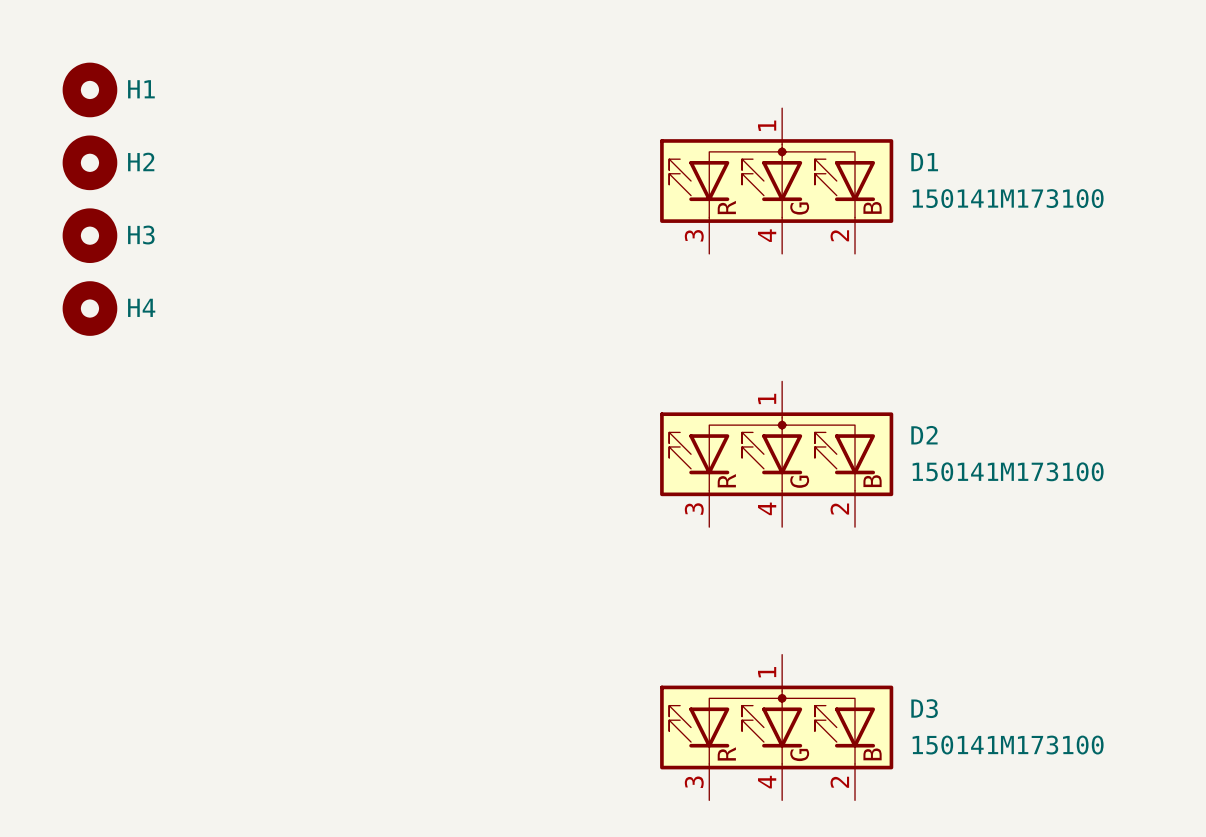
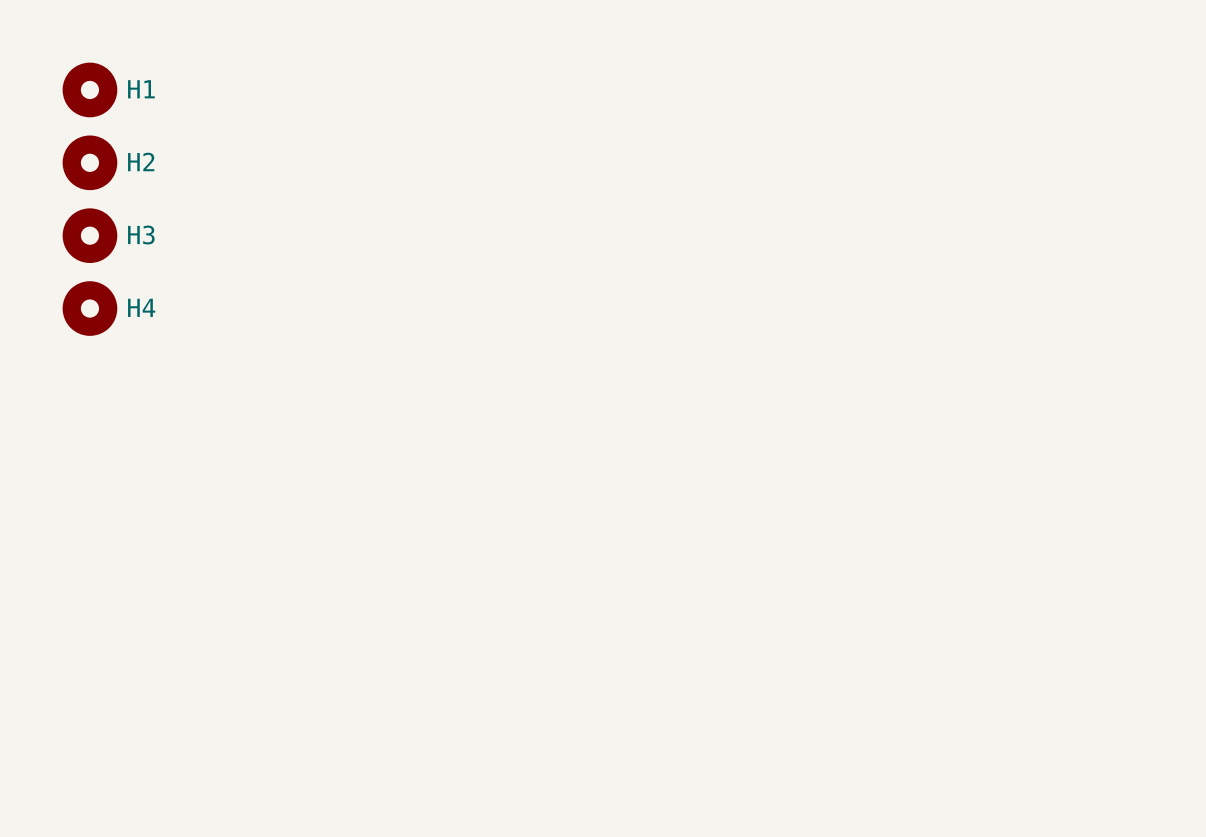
D1: 150141M173100 (776, 181) -> none
D2: 150141M173100 (776, 454) -> none
D3: 150141M173100 (776, 727) -> none

